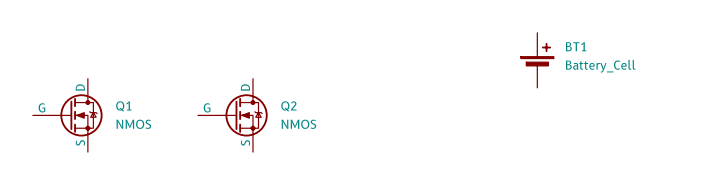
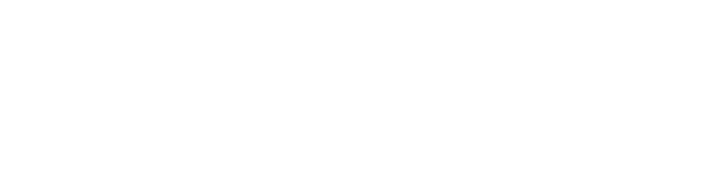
BT1: Battery_Cell (537, 60) -> none
Q1: NMOS (67, 115) -> none
Q2: NMOS (232, 115) -> none

